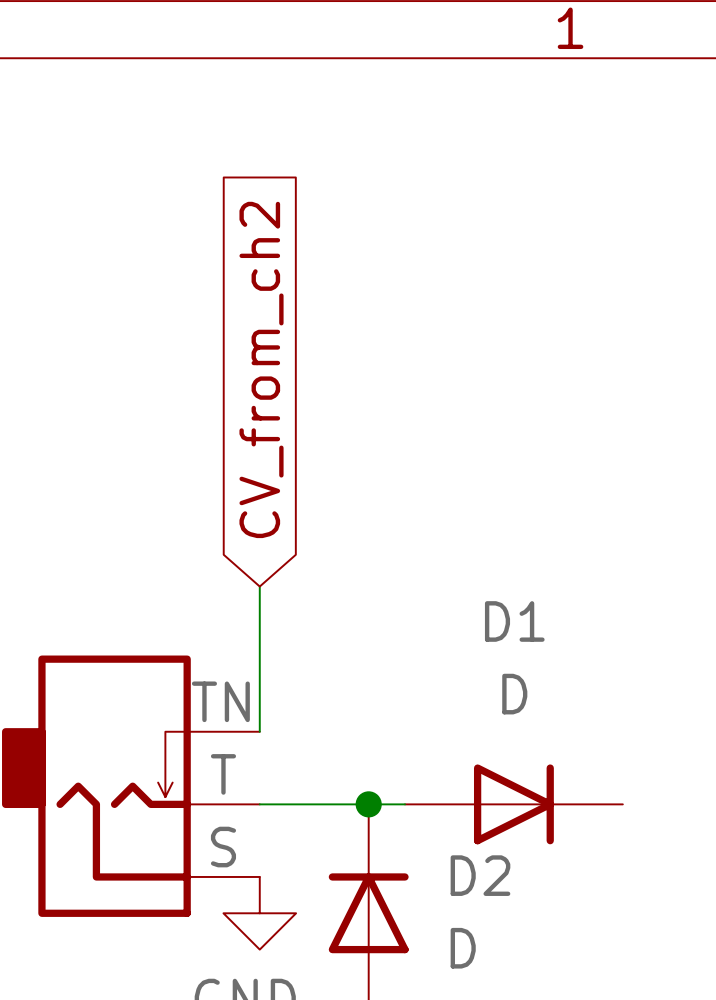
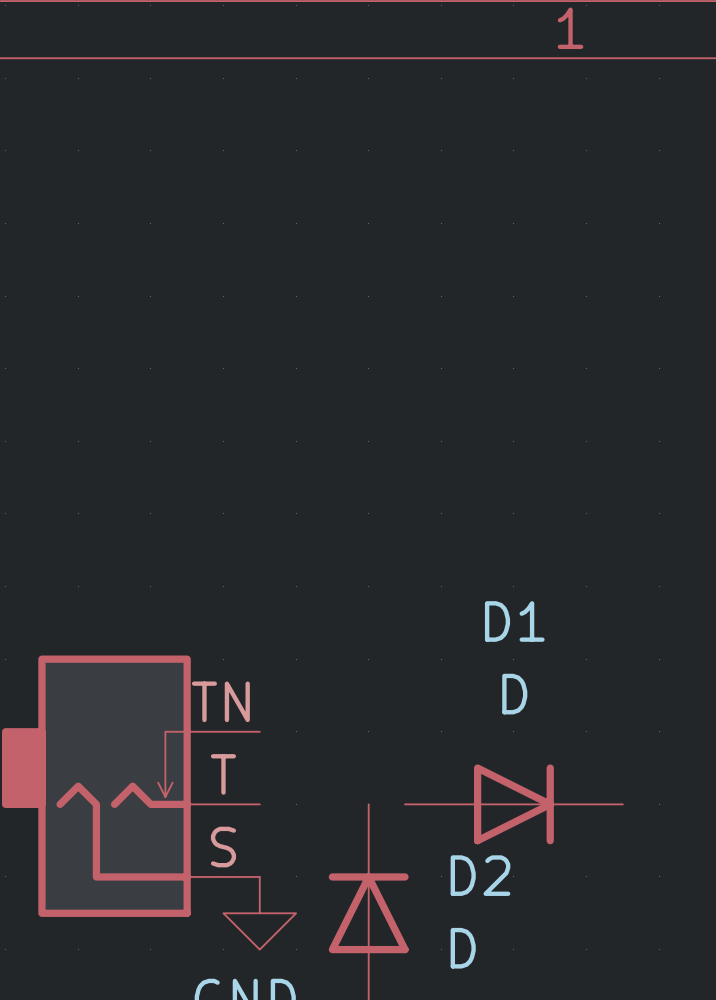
global label: CV_from_ch2 (261, 369) -> none
wire: (259, 586) (259, 731) -> none
wire: (259, 804) (405, 804) -> none
junction: (368, 804) -> none

